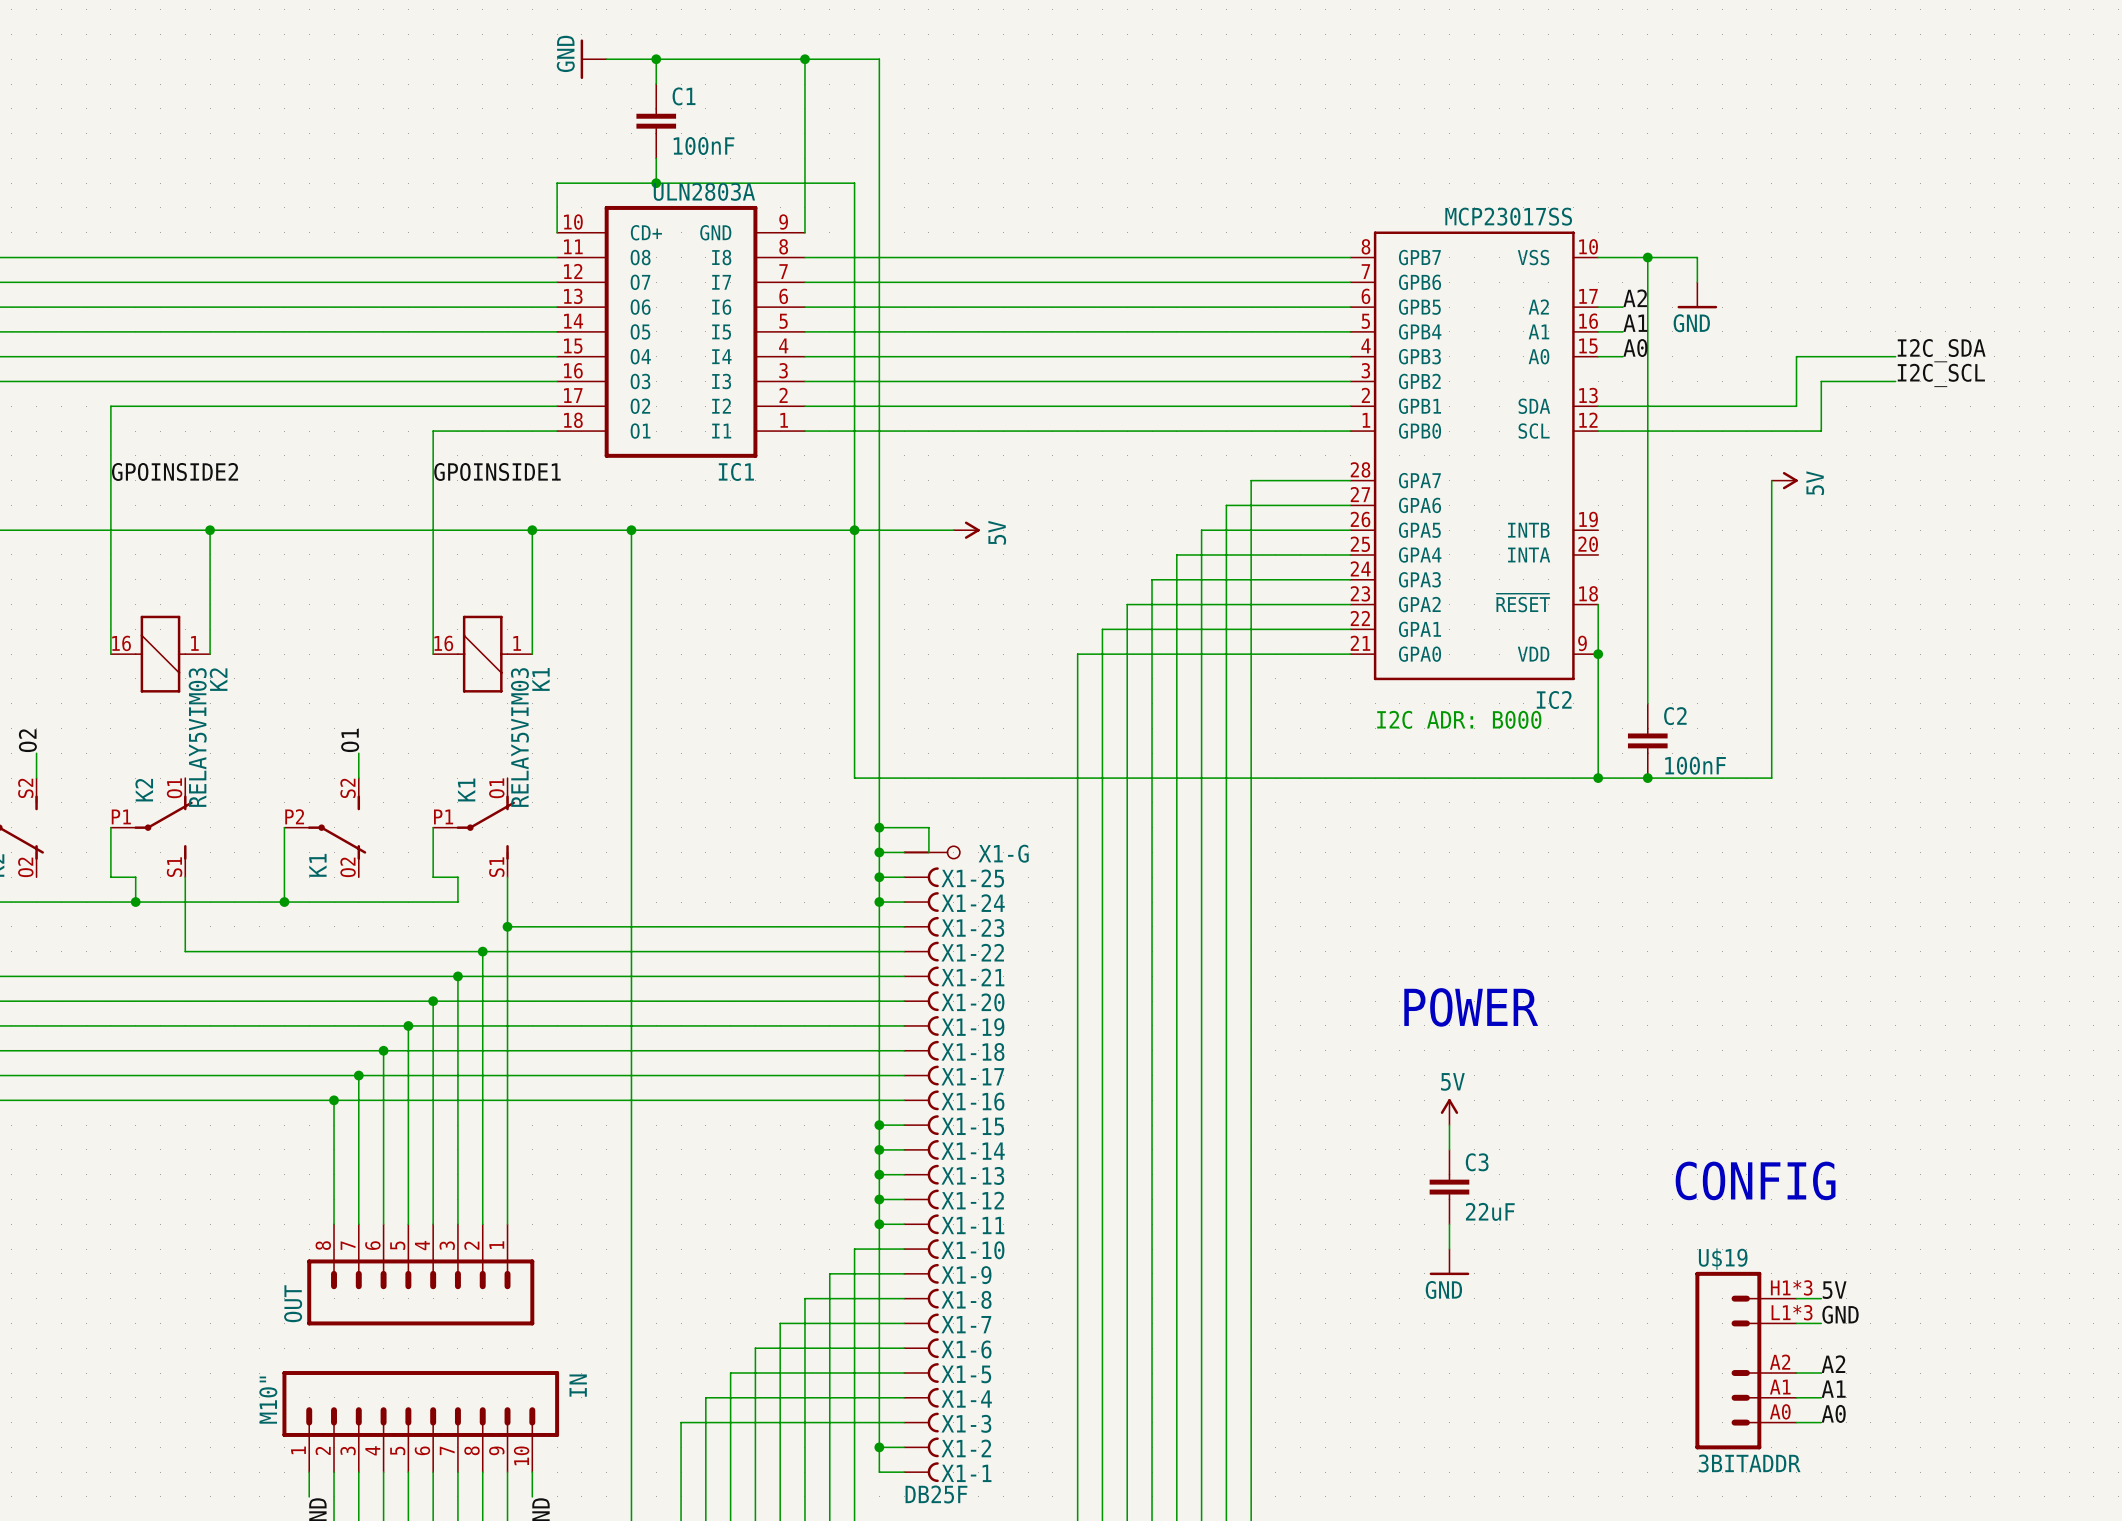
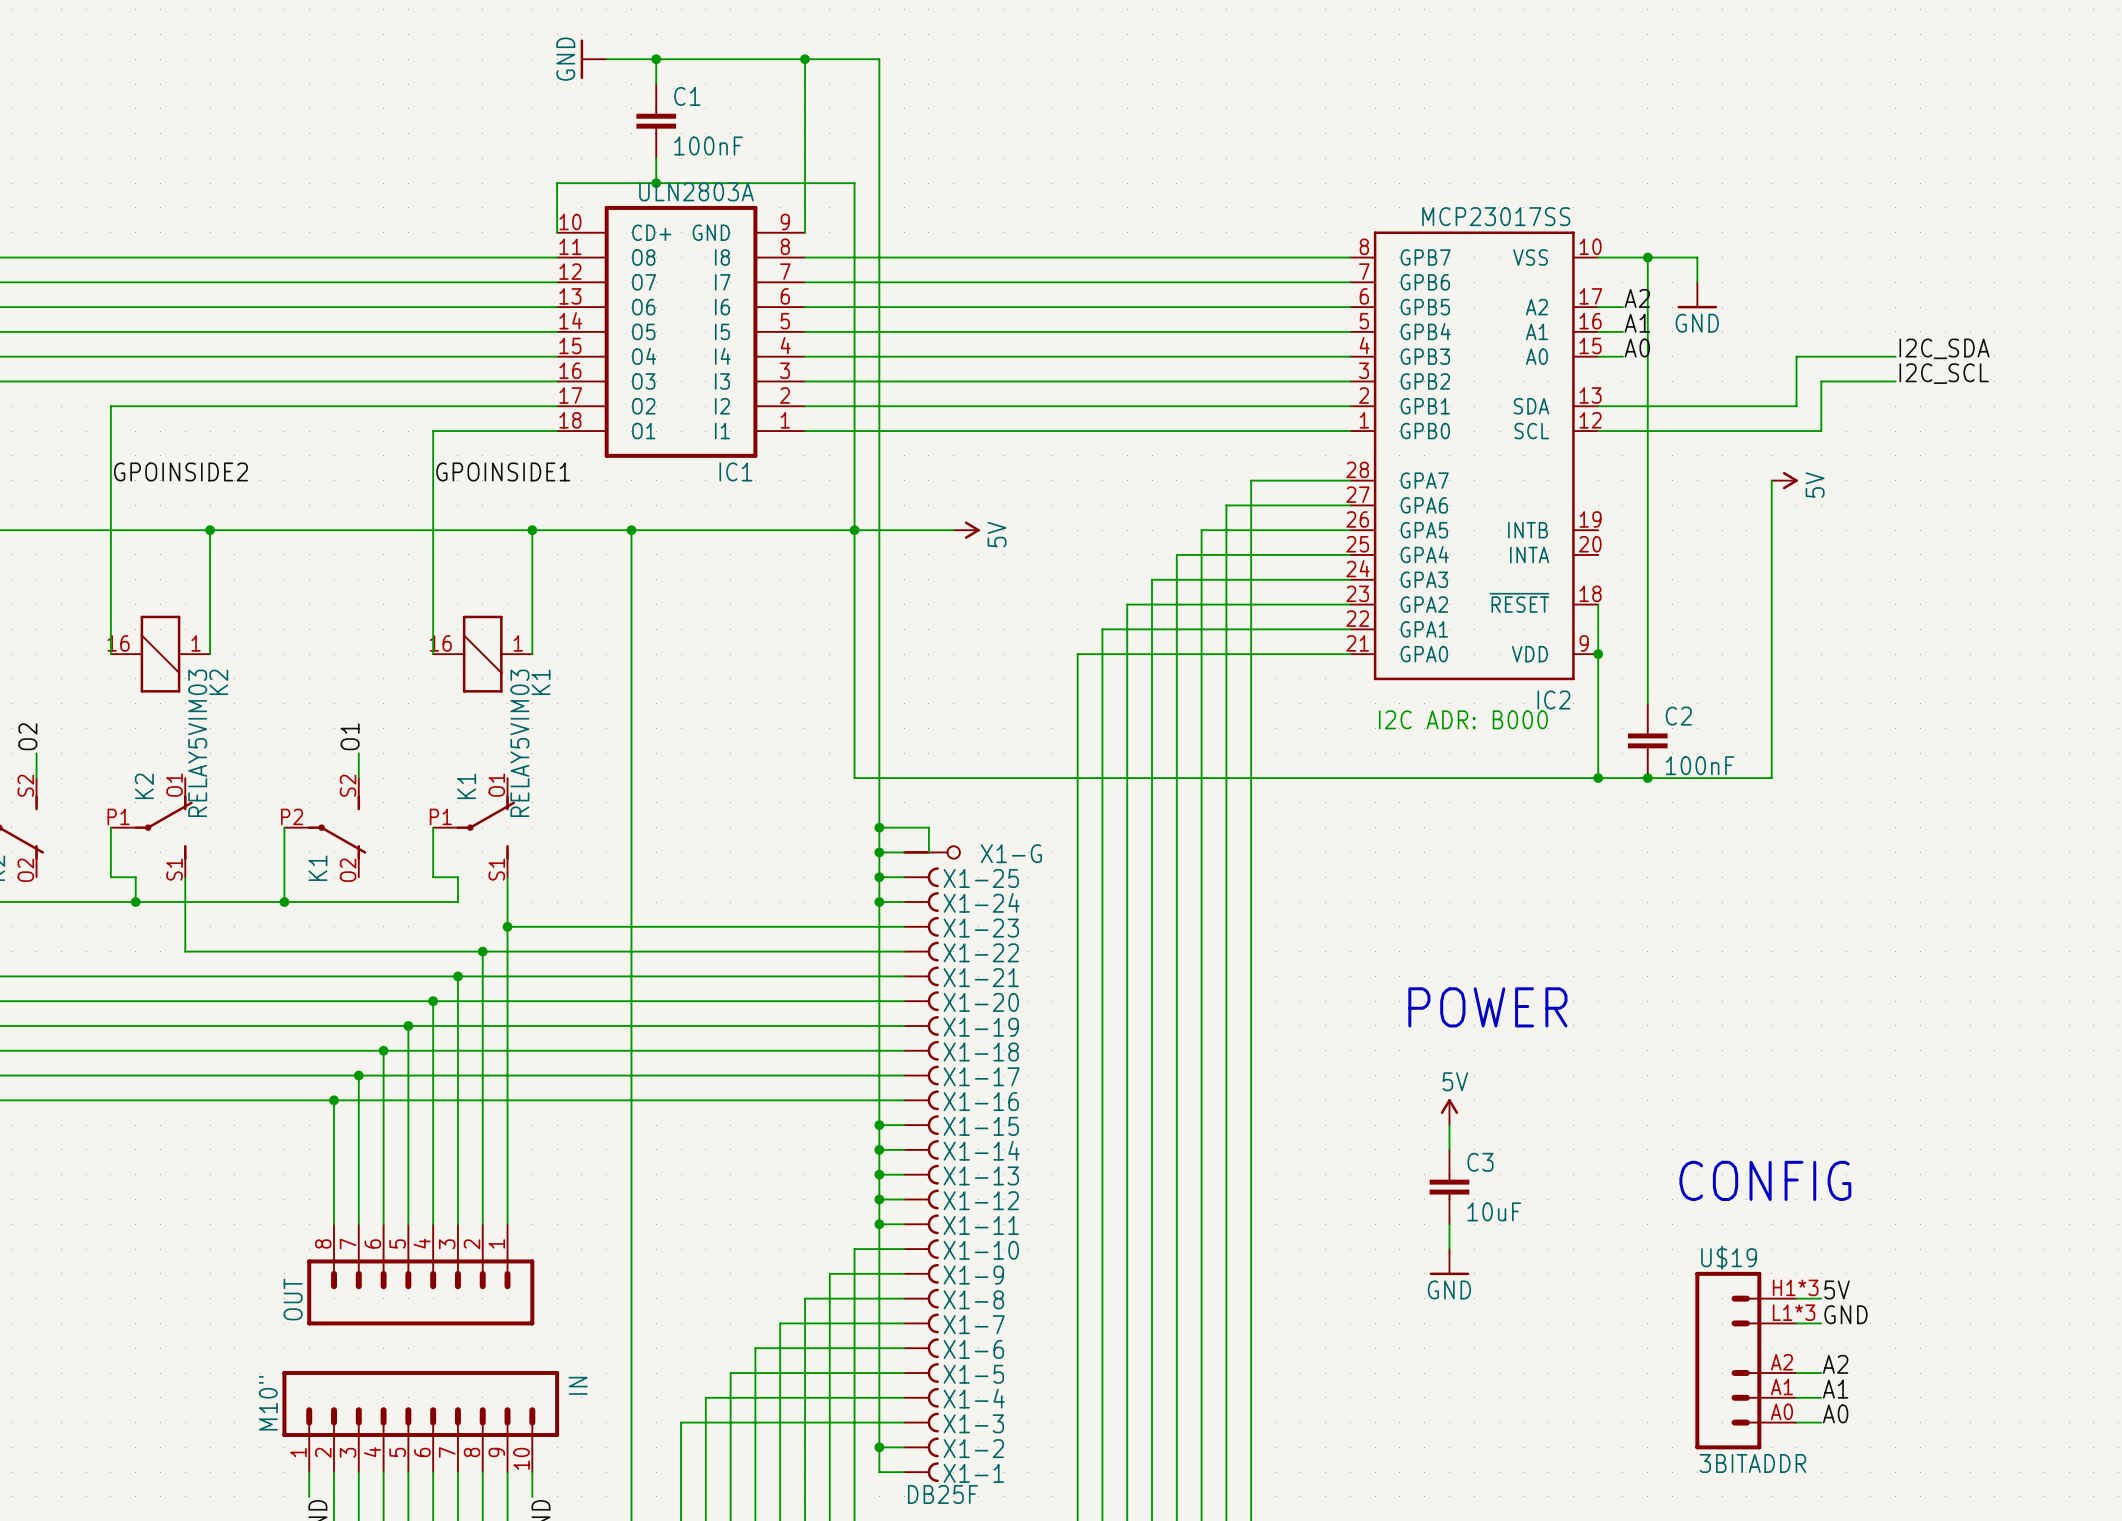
C3 value: 22uF (1490, 1211) -> 10uF (1494, 1211)

